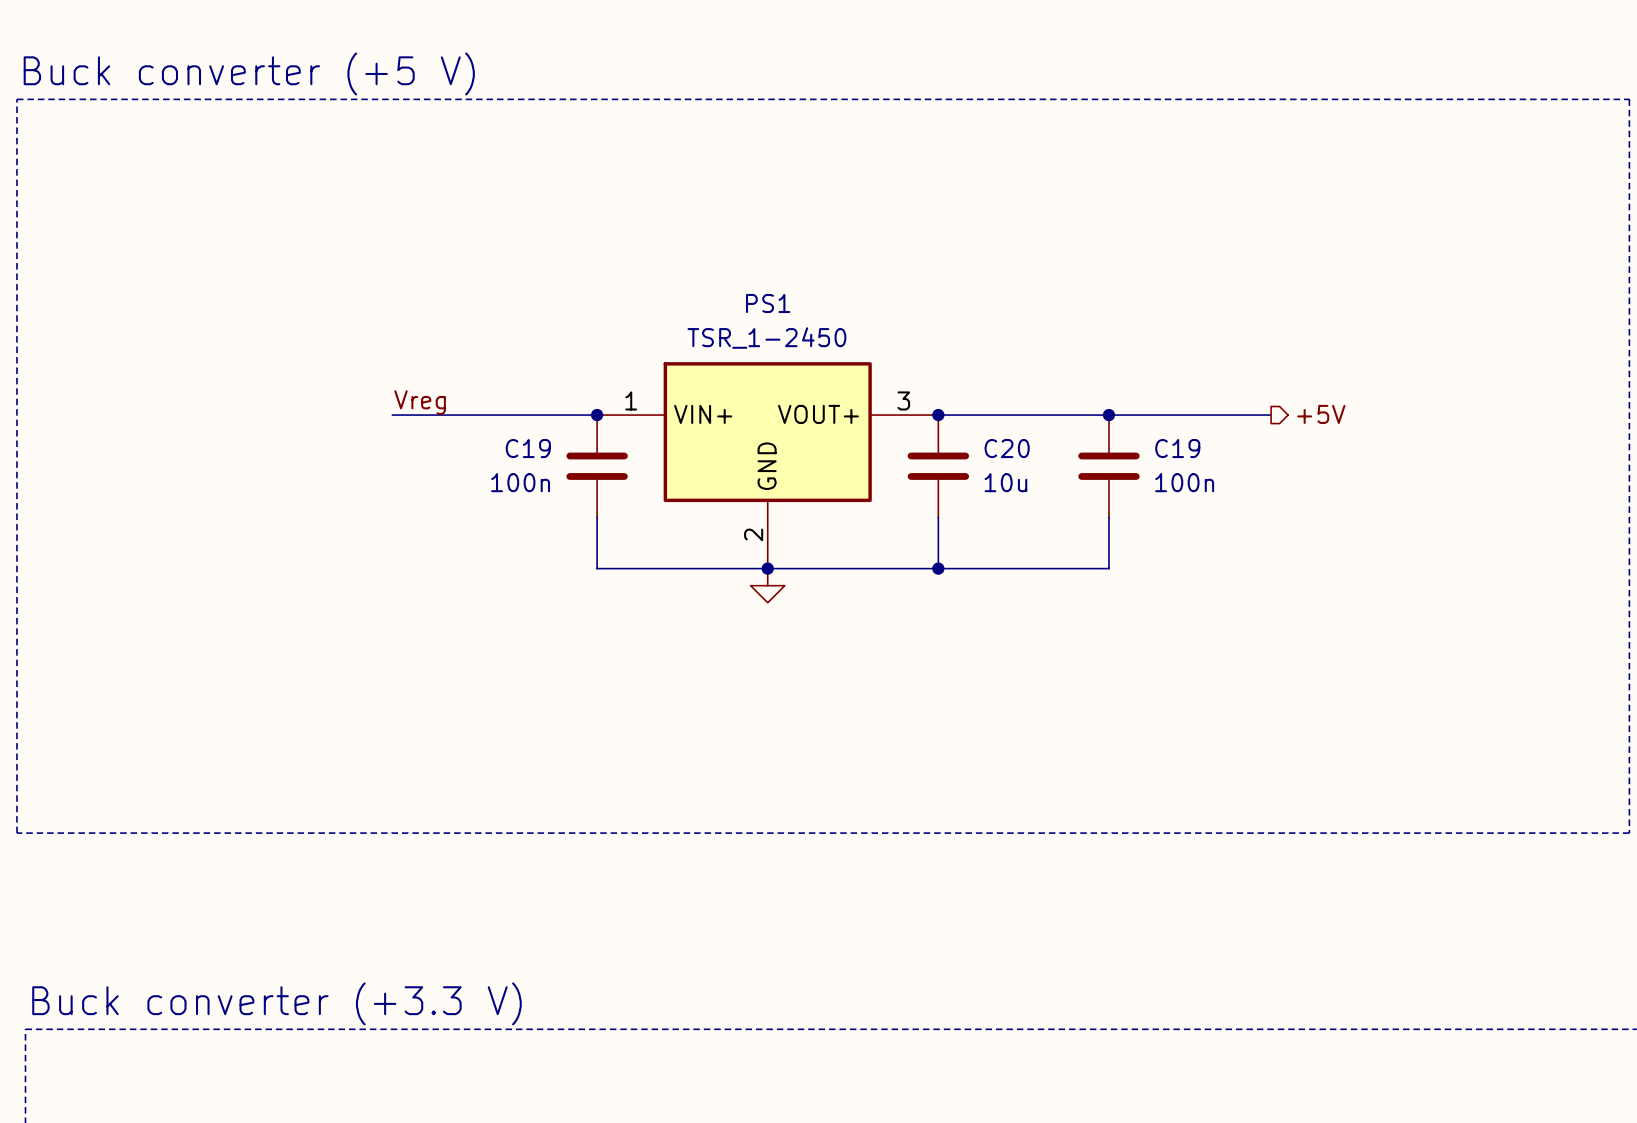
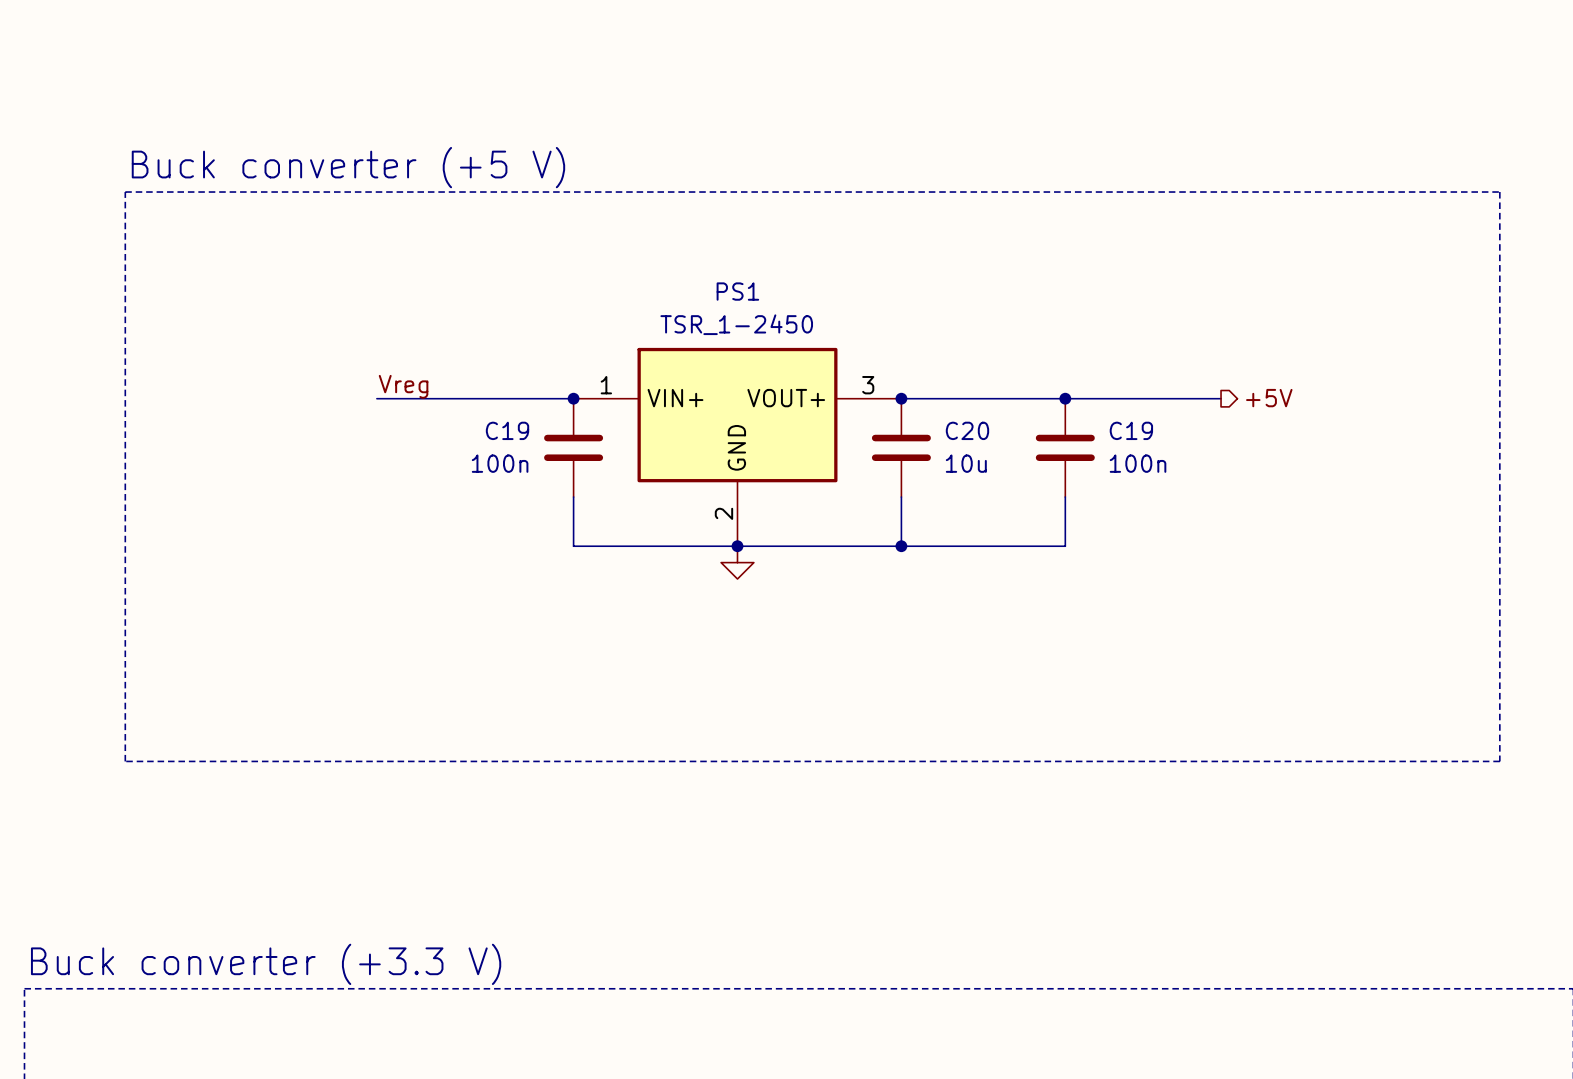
text position: Buck converter (+5 V) (249, 73) -> Buck converter (+5 V) (348, 167)
line: (16, 99) (1629, 99) (1629, 833) (16, 833) (16, 99) -> (125, 192) (125, 761) (1499, 761) (1499, 192) (125, 192)

